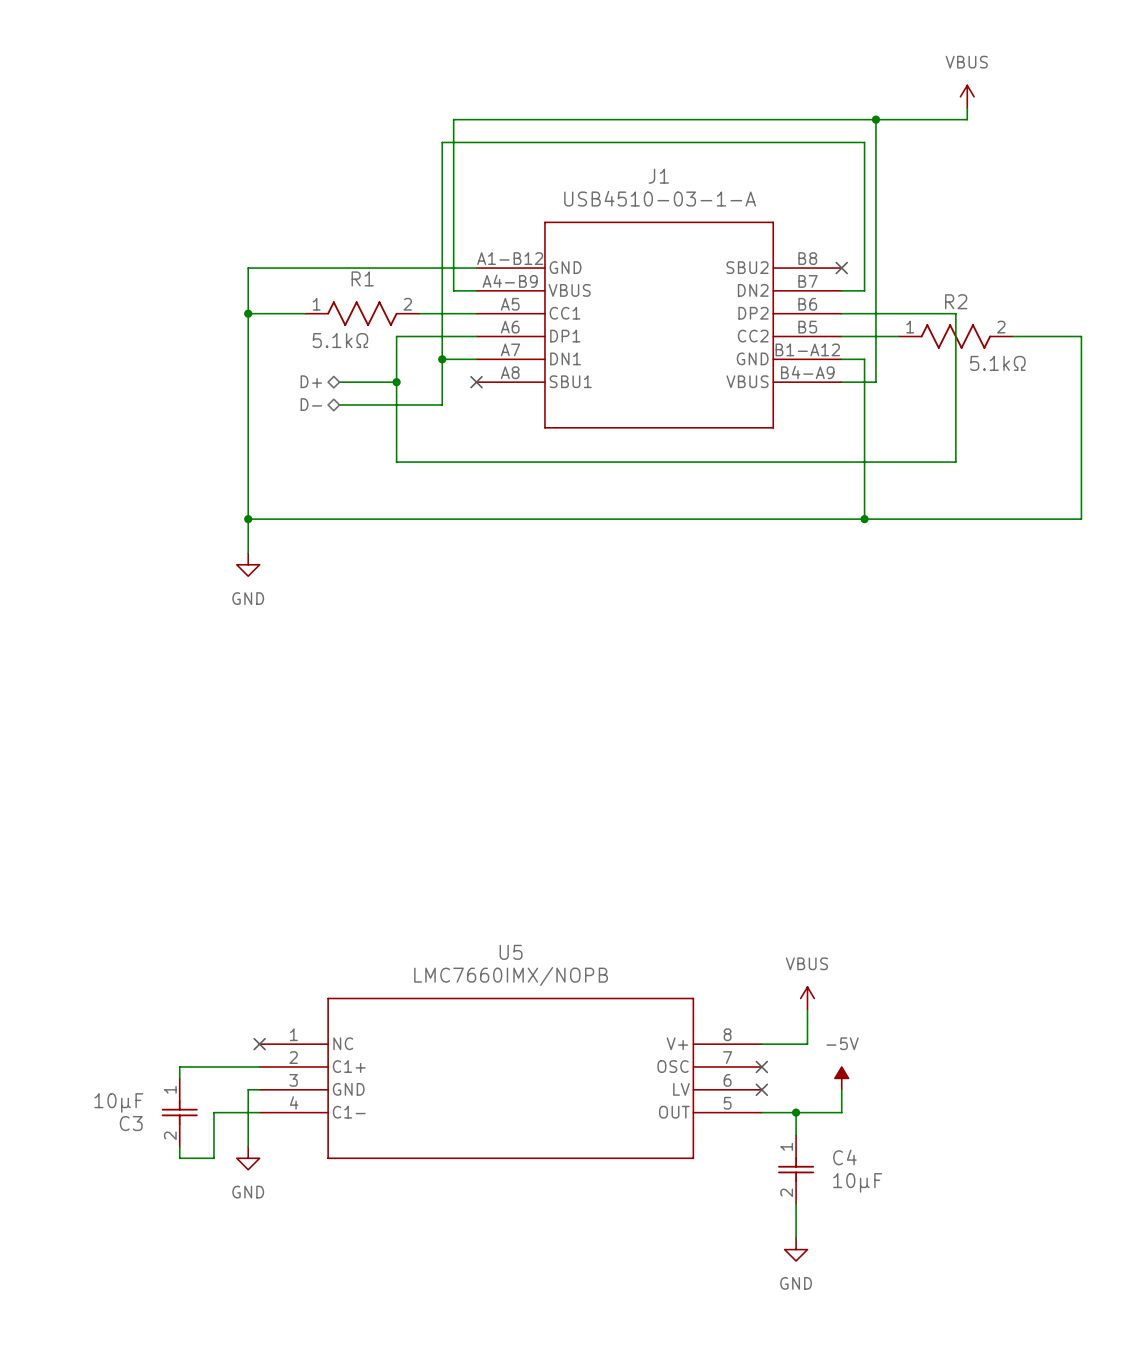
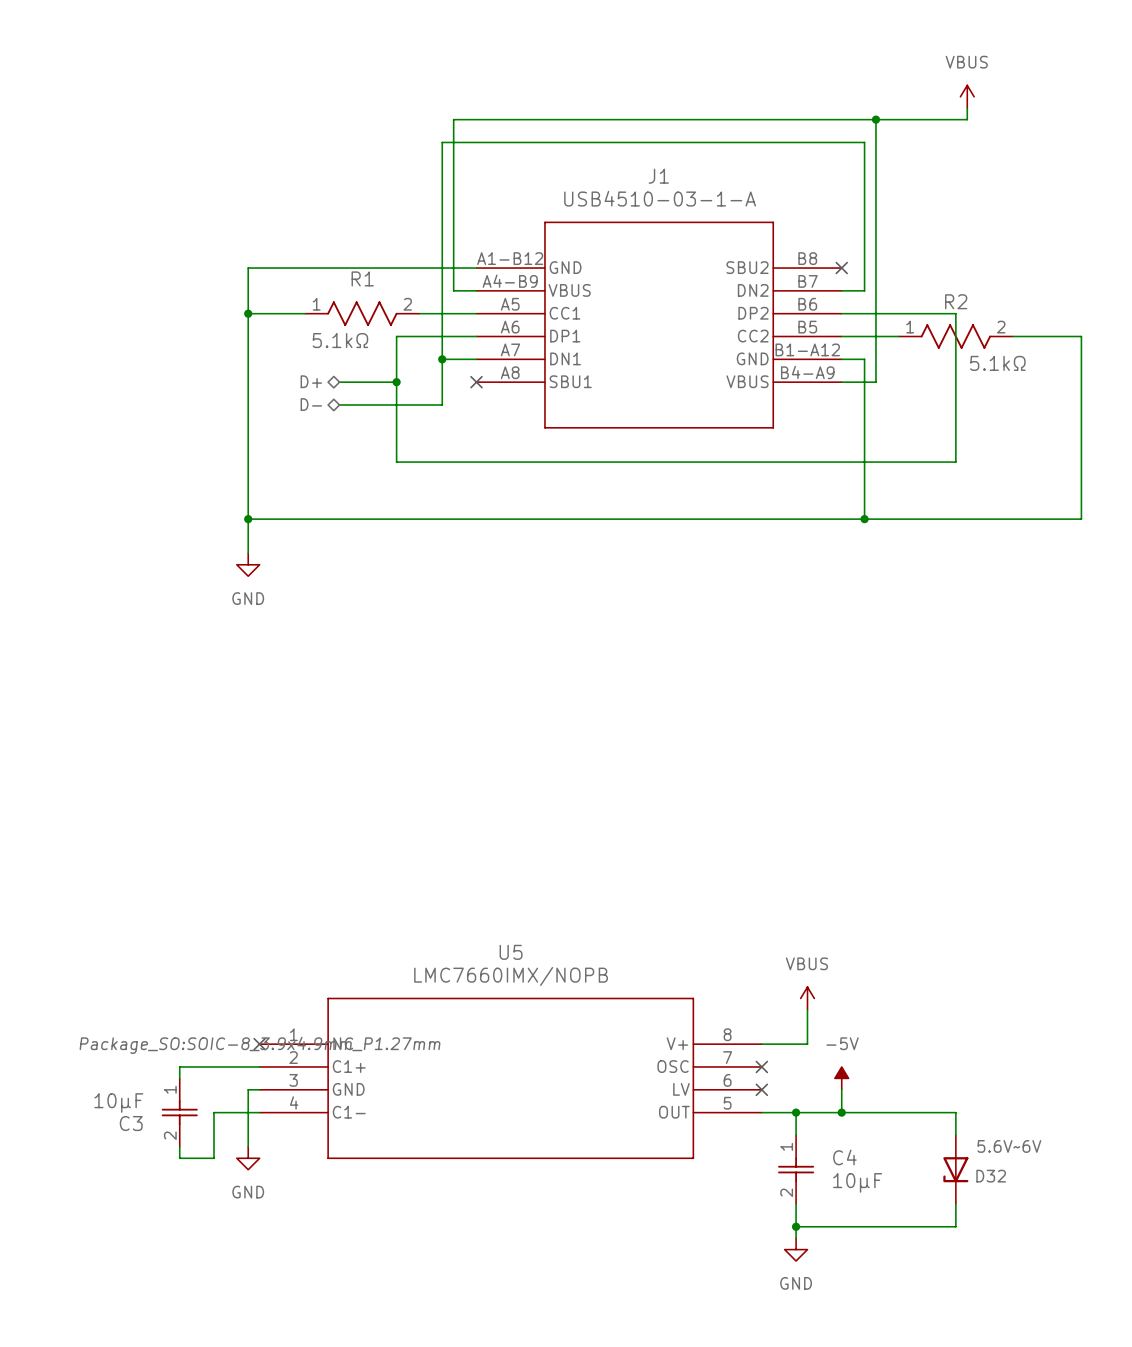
U5 text: none -> Package_SO:SOIC-8_3.9x4.9mm_P1.27mm (260, 1045)
wire: none -> (841, 1112) (955, 1112) (955, 1135)
junction: none -> (841, 1112)
D32: none -> 5.6V~6V (955, 1169)
wire: none -> (955, 1203) (955, 1226) (796, 1226)
junction: none -> (796, 1226)

